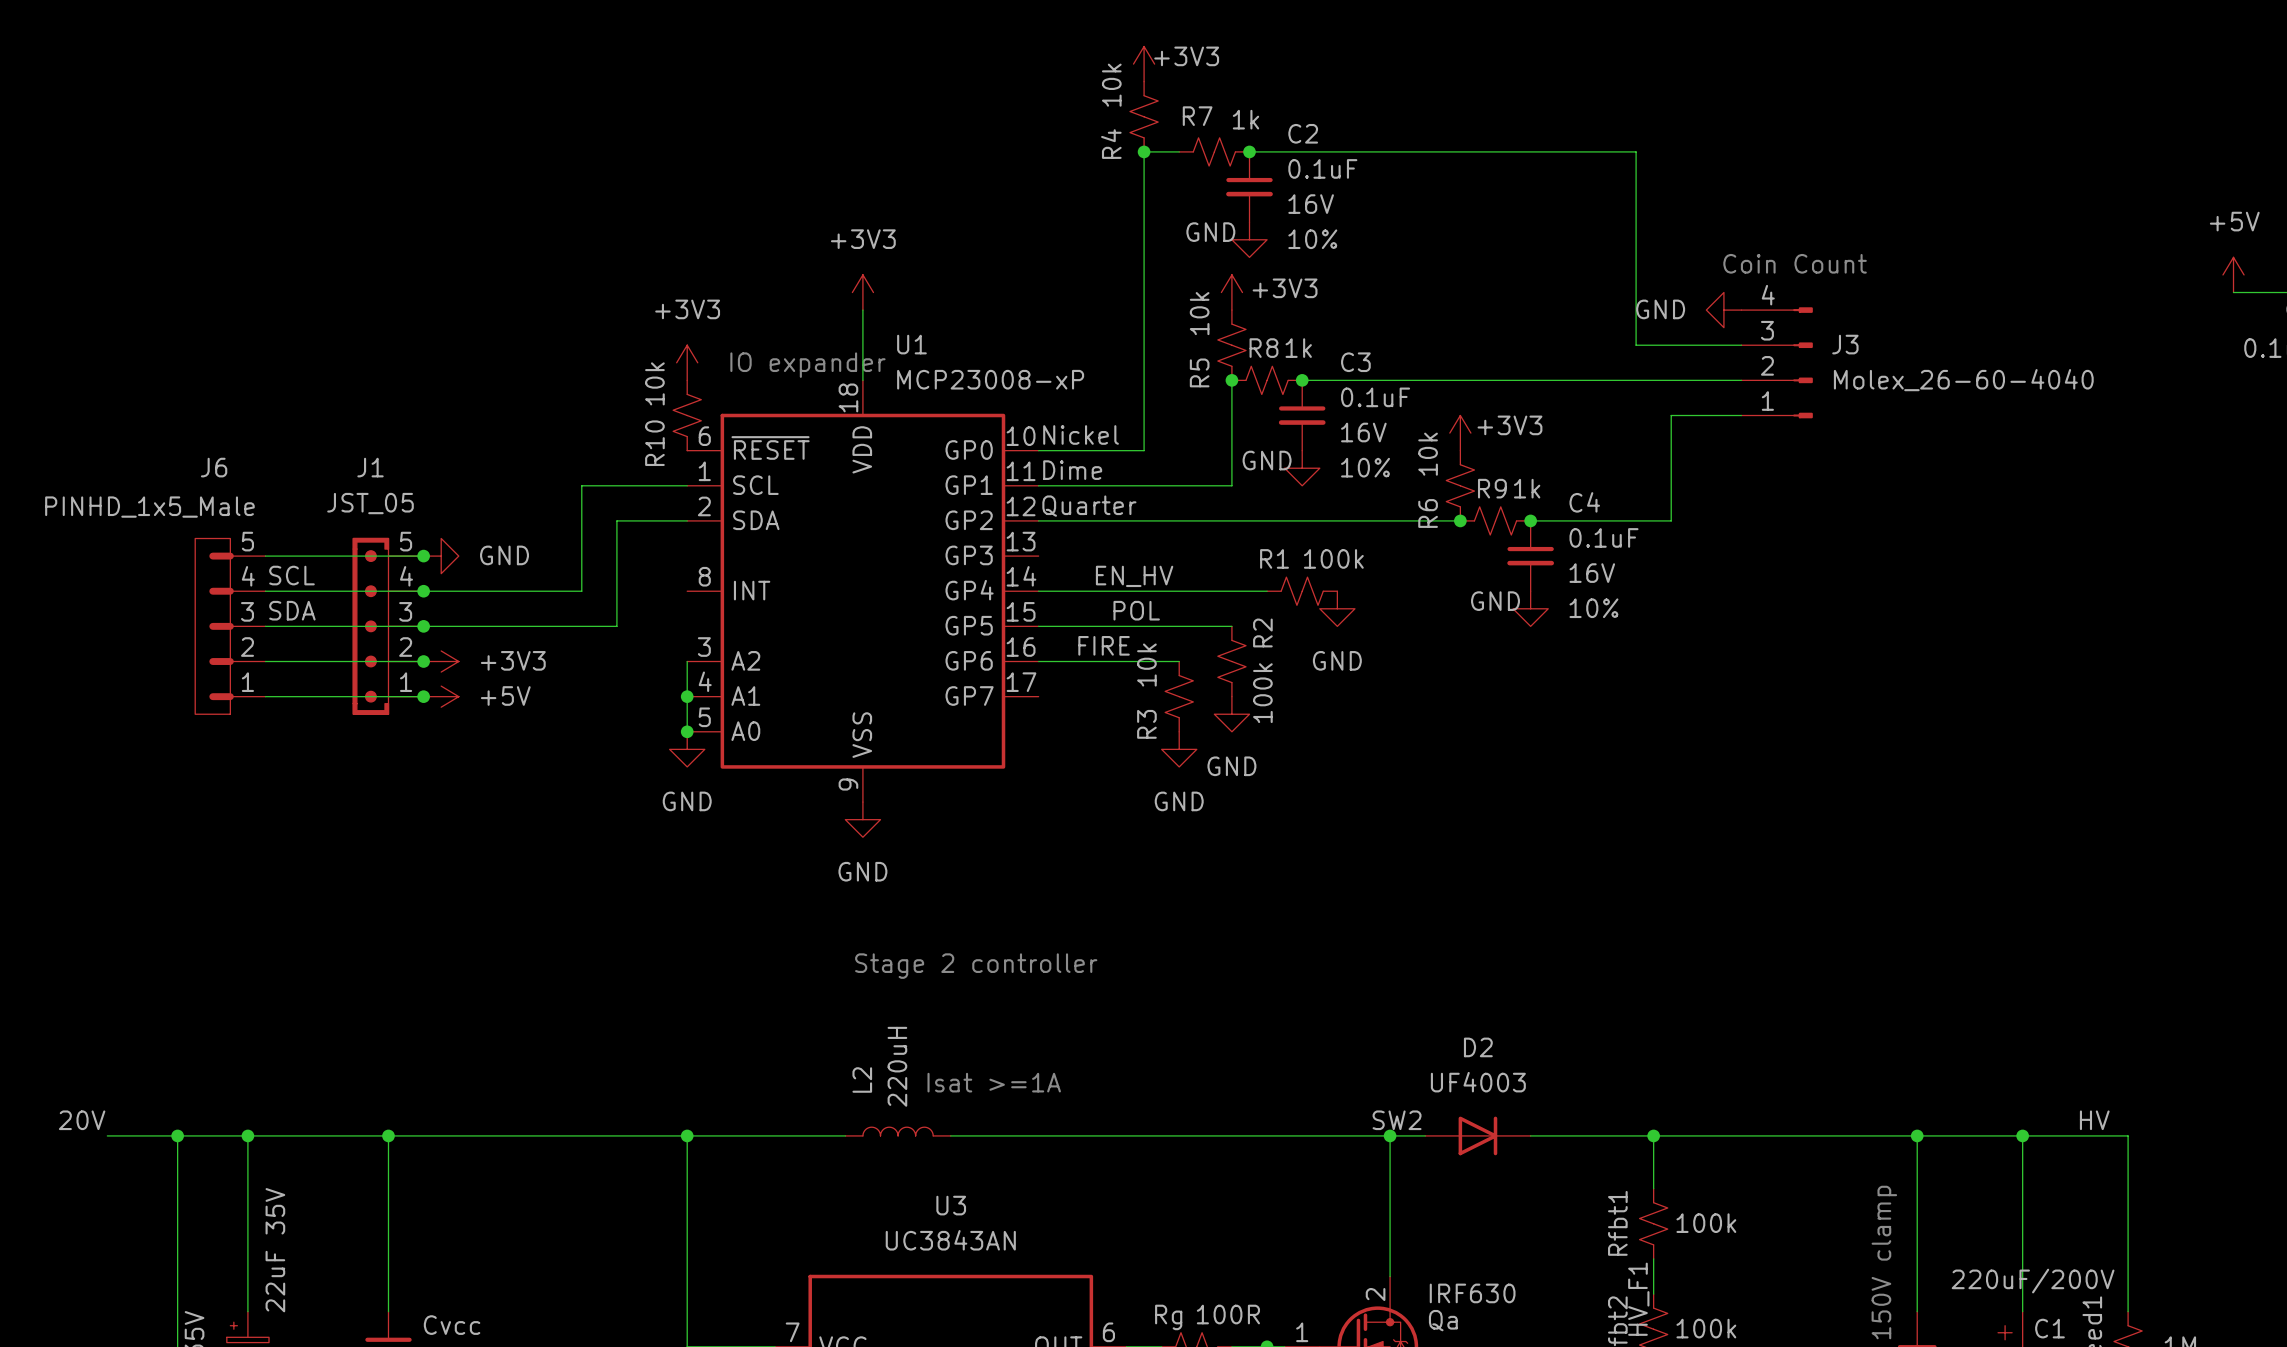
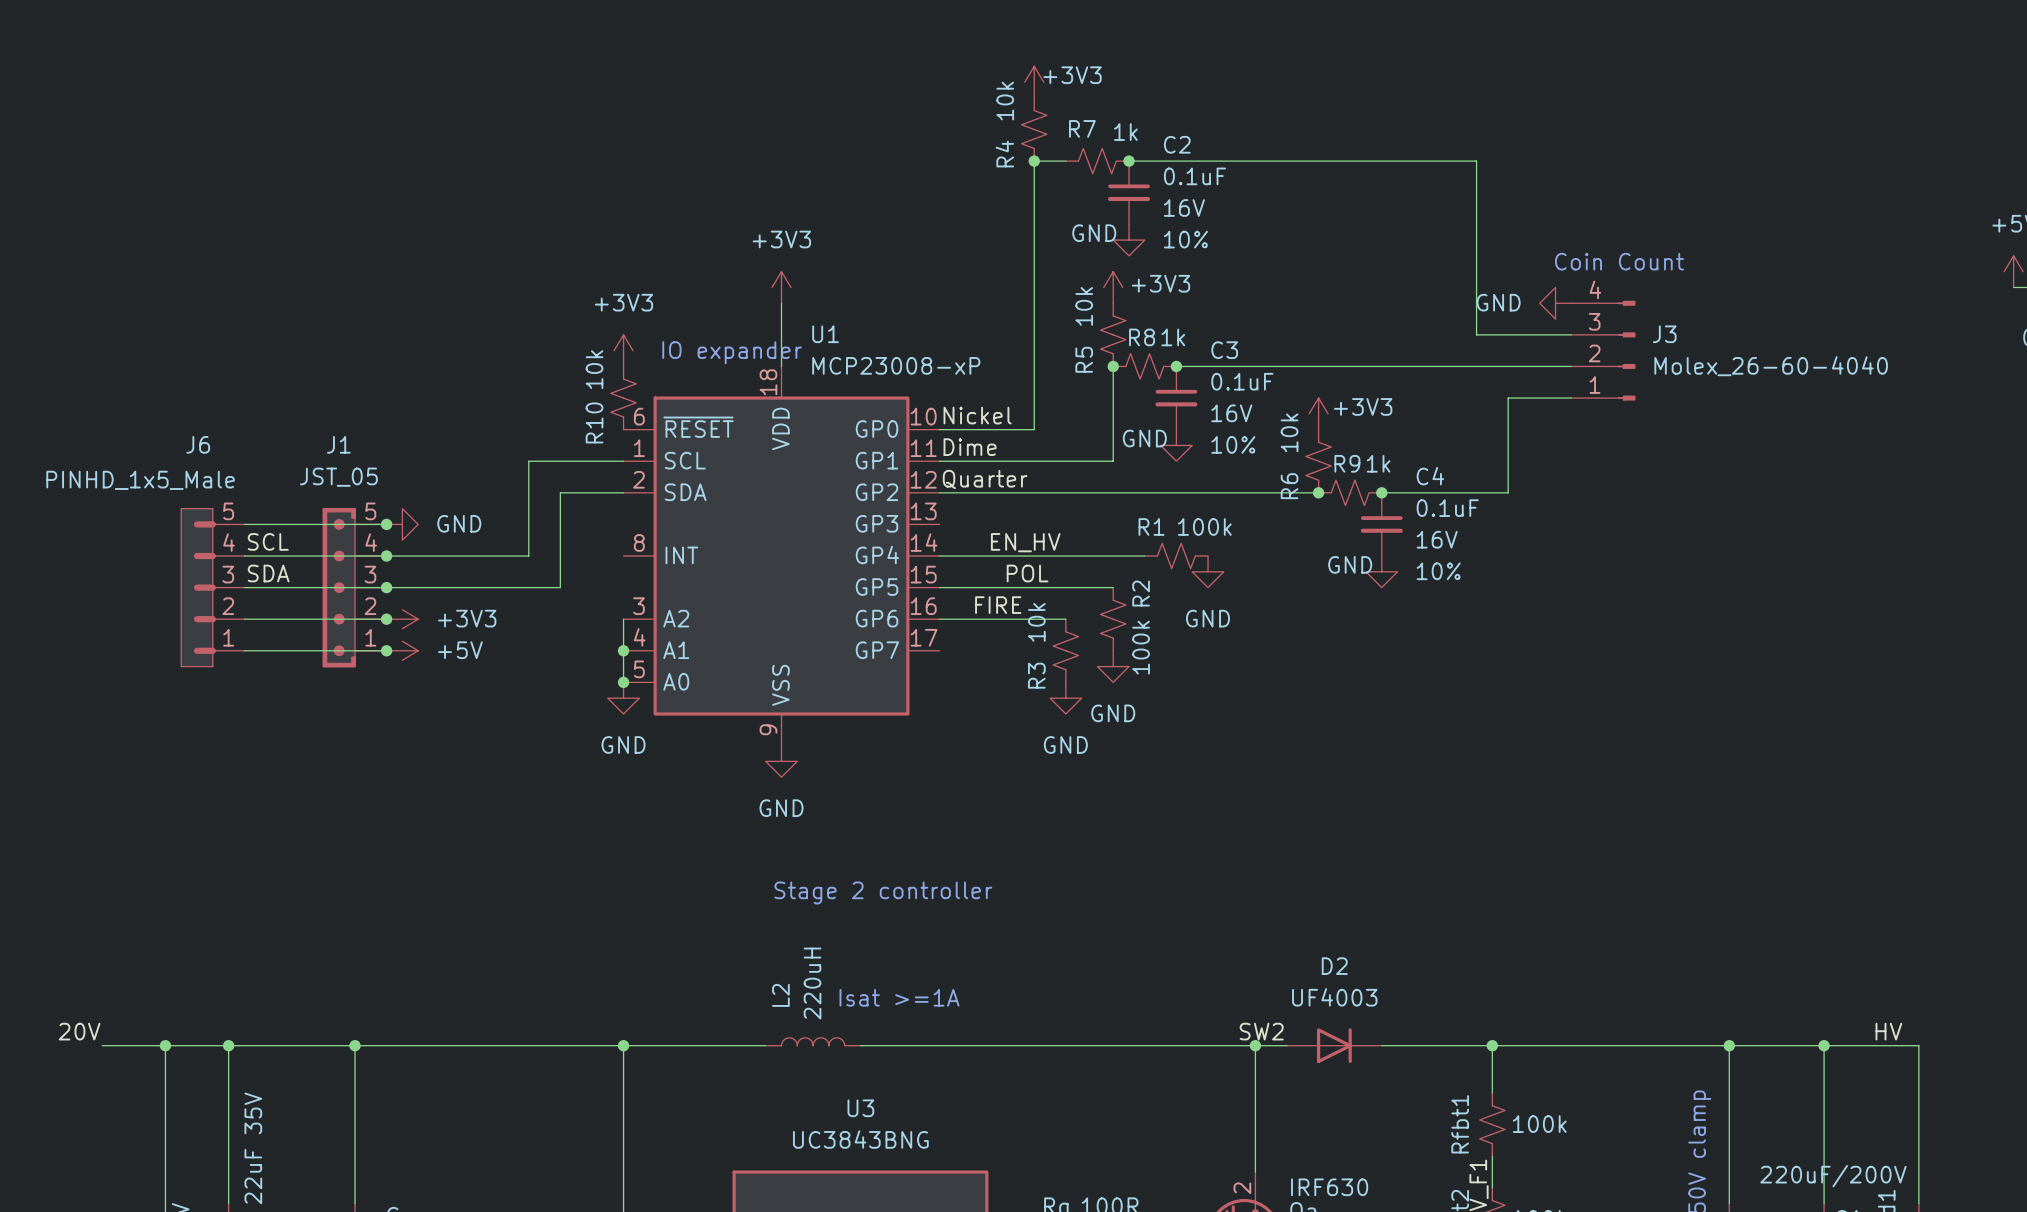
U3 value: UC3843AN (950, 1240) -> UC3843BNG (860, 1139)

